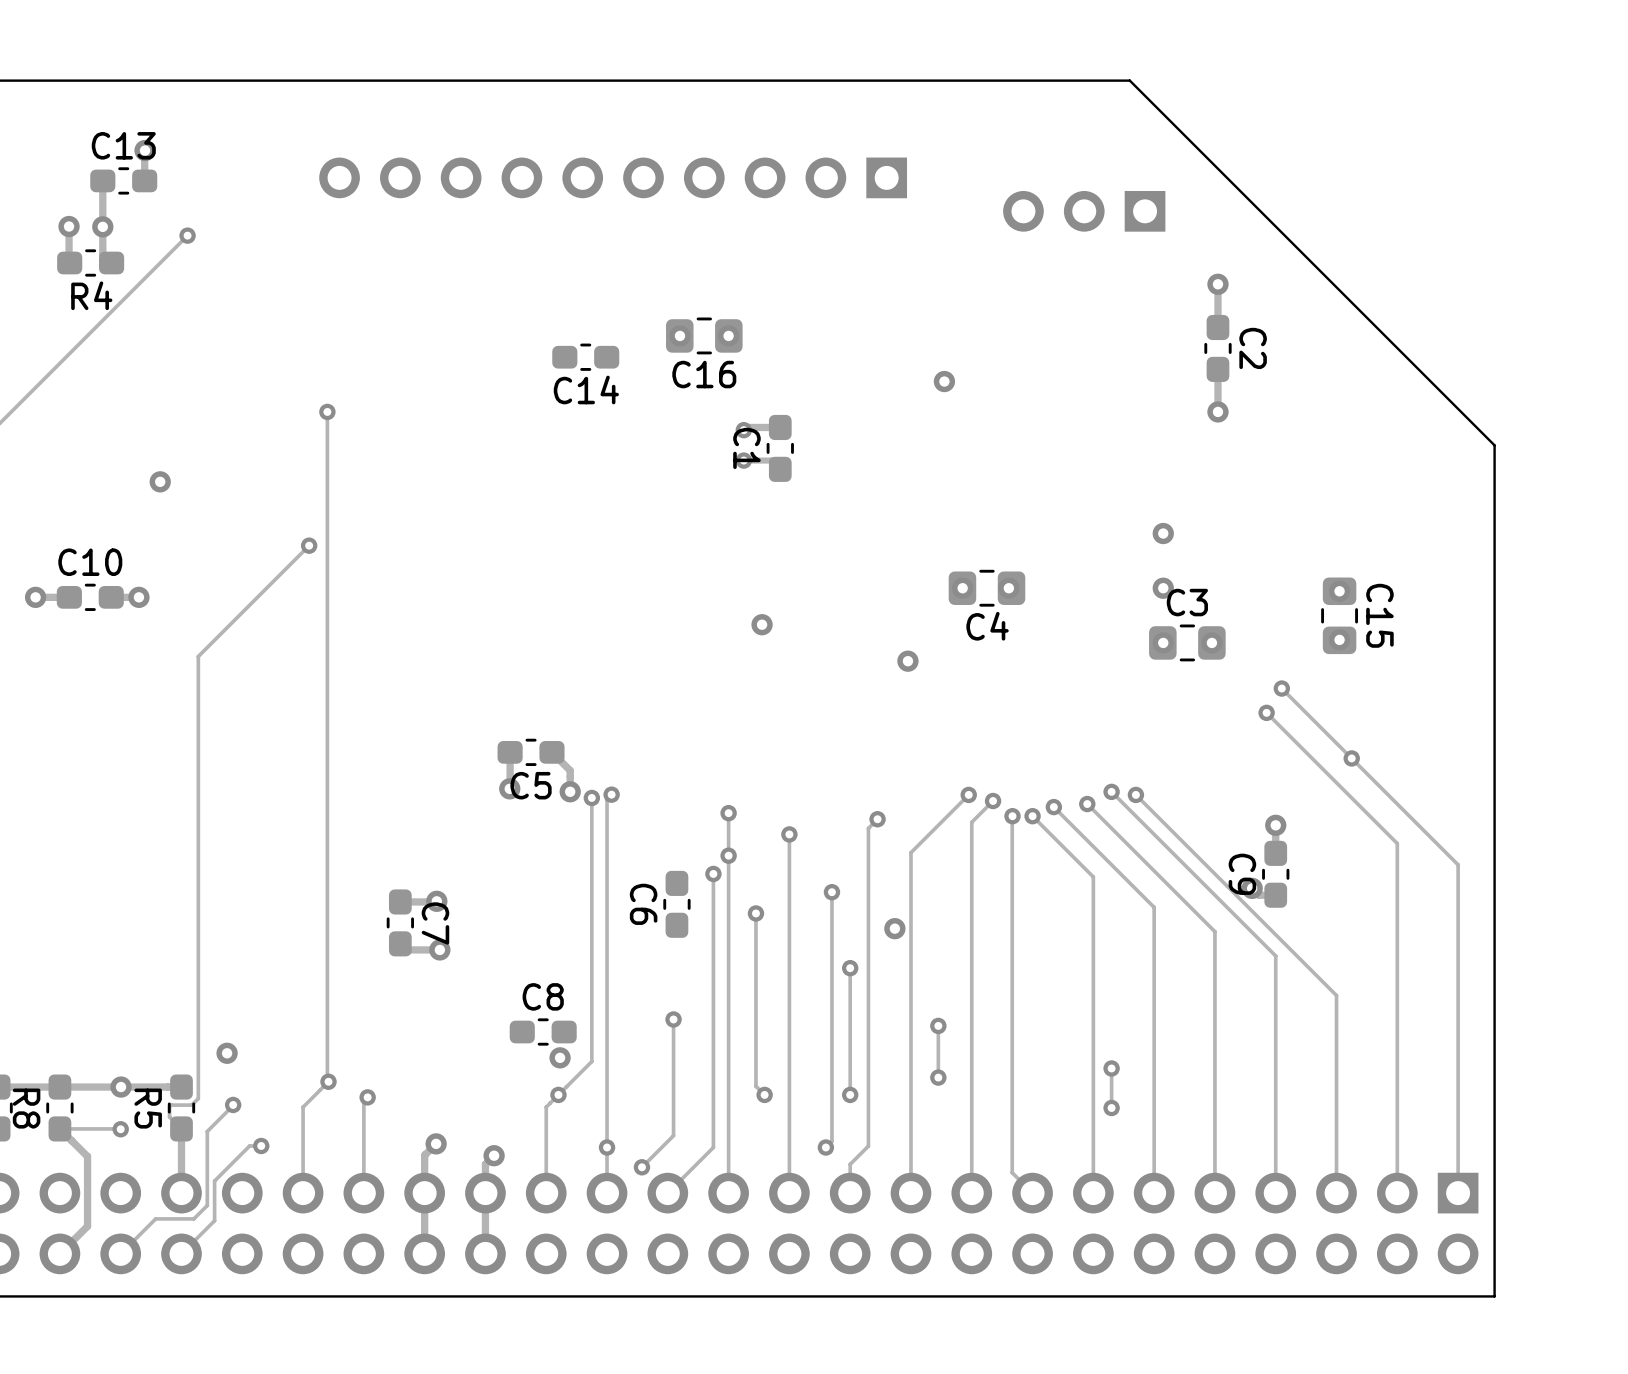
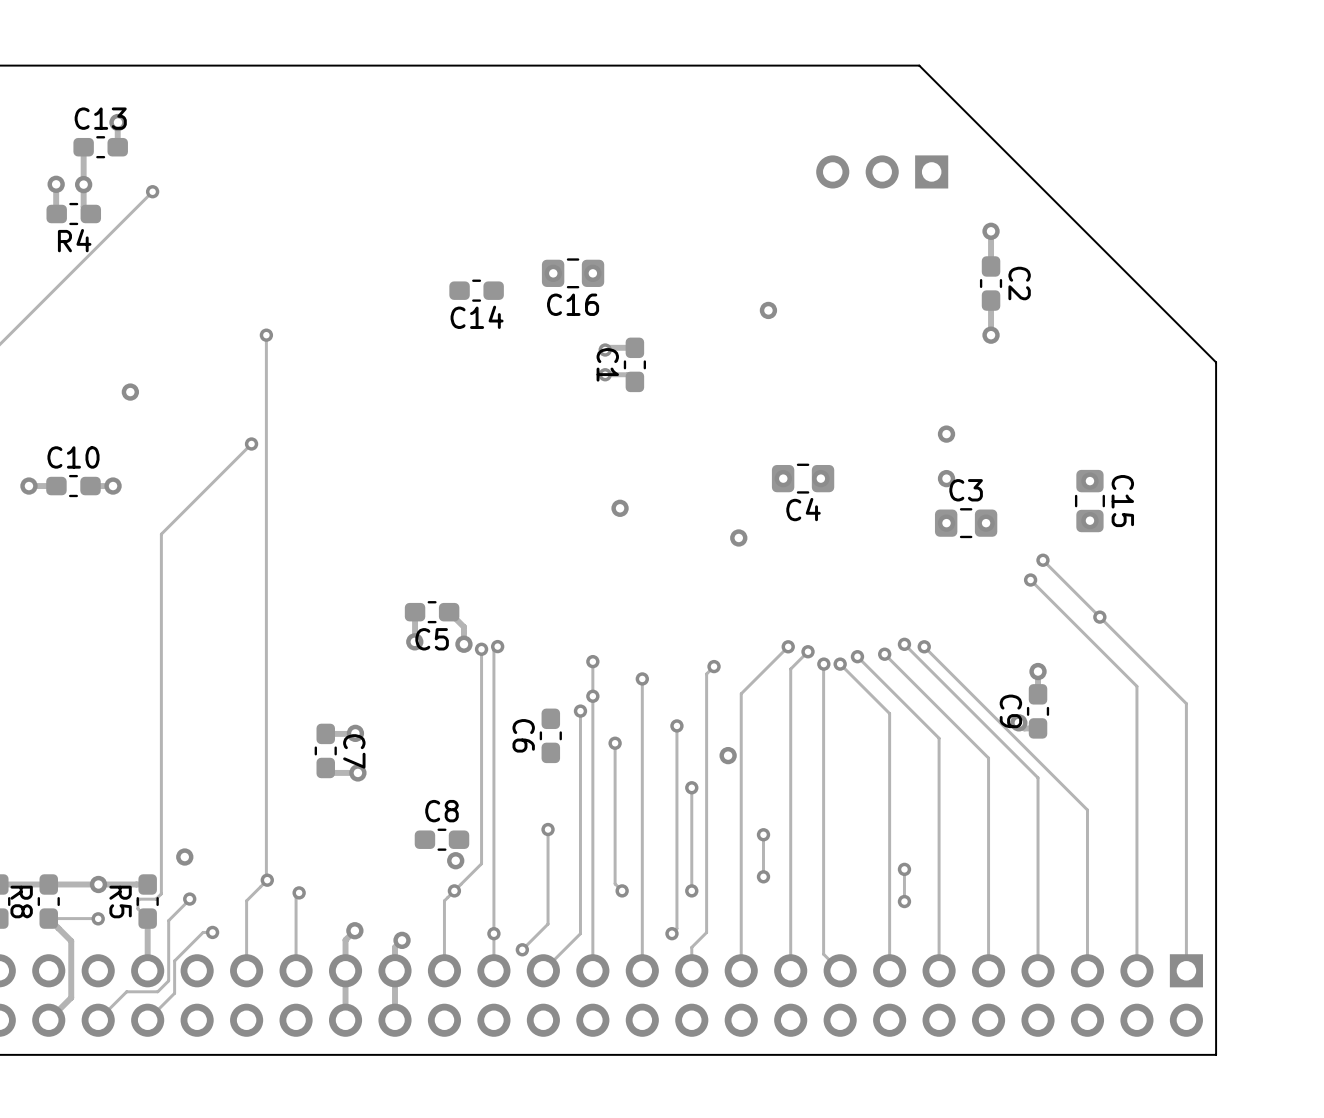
part: (613, 177) -> none

